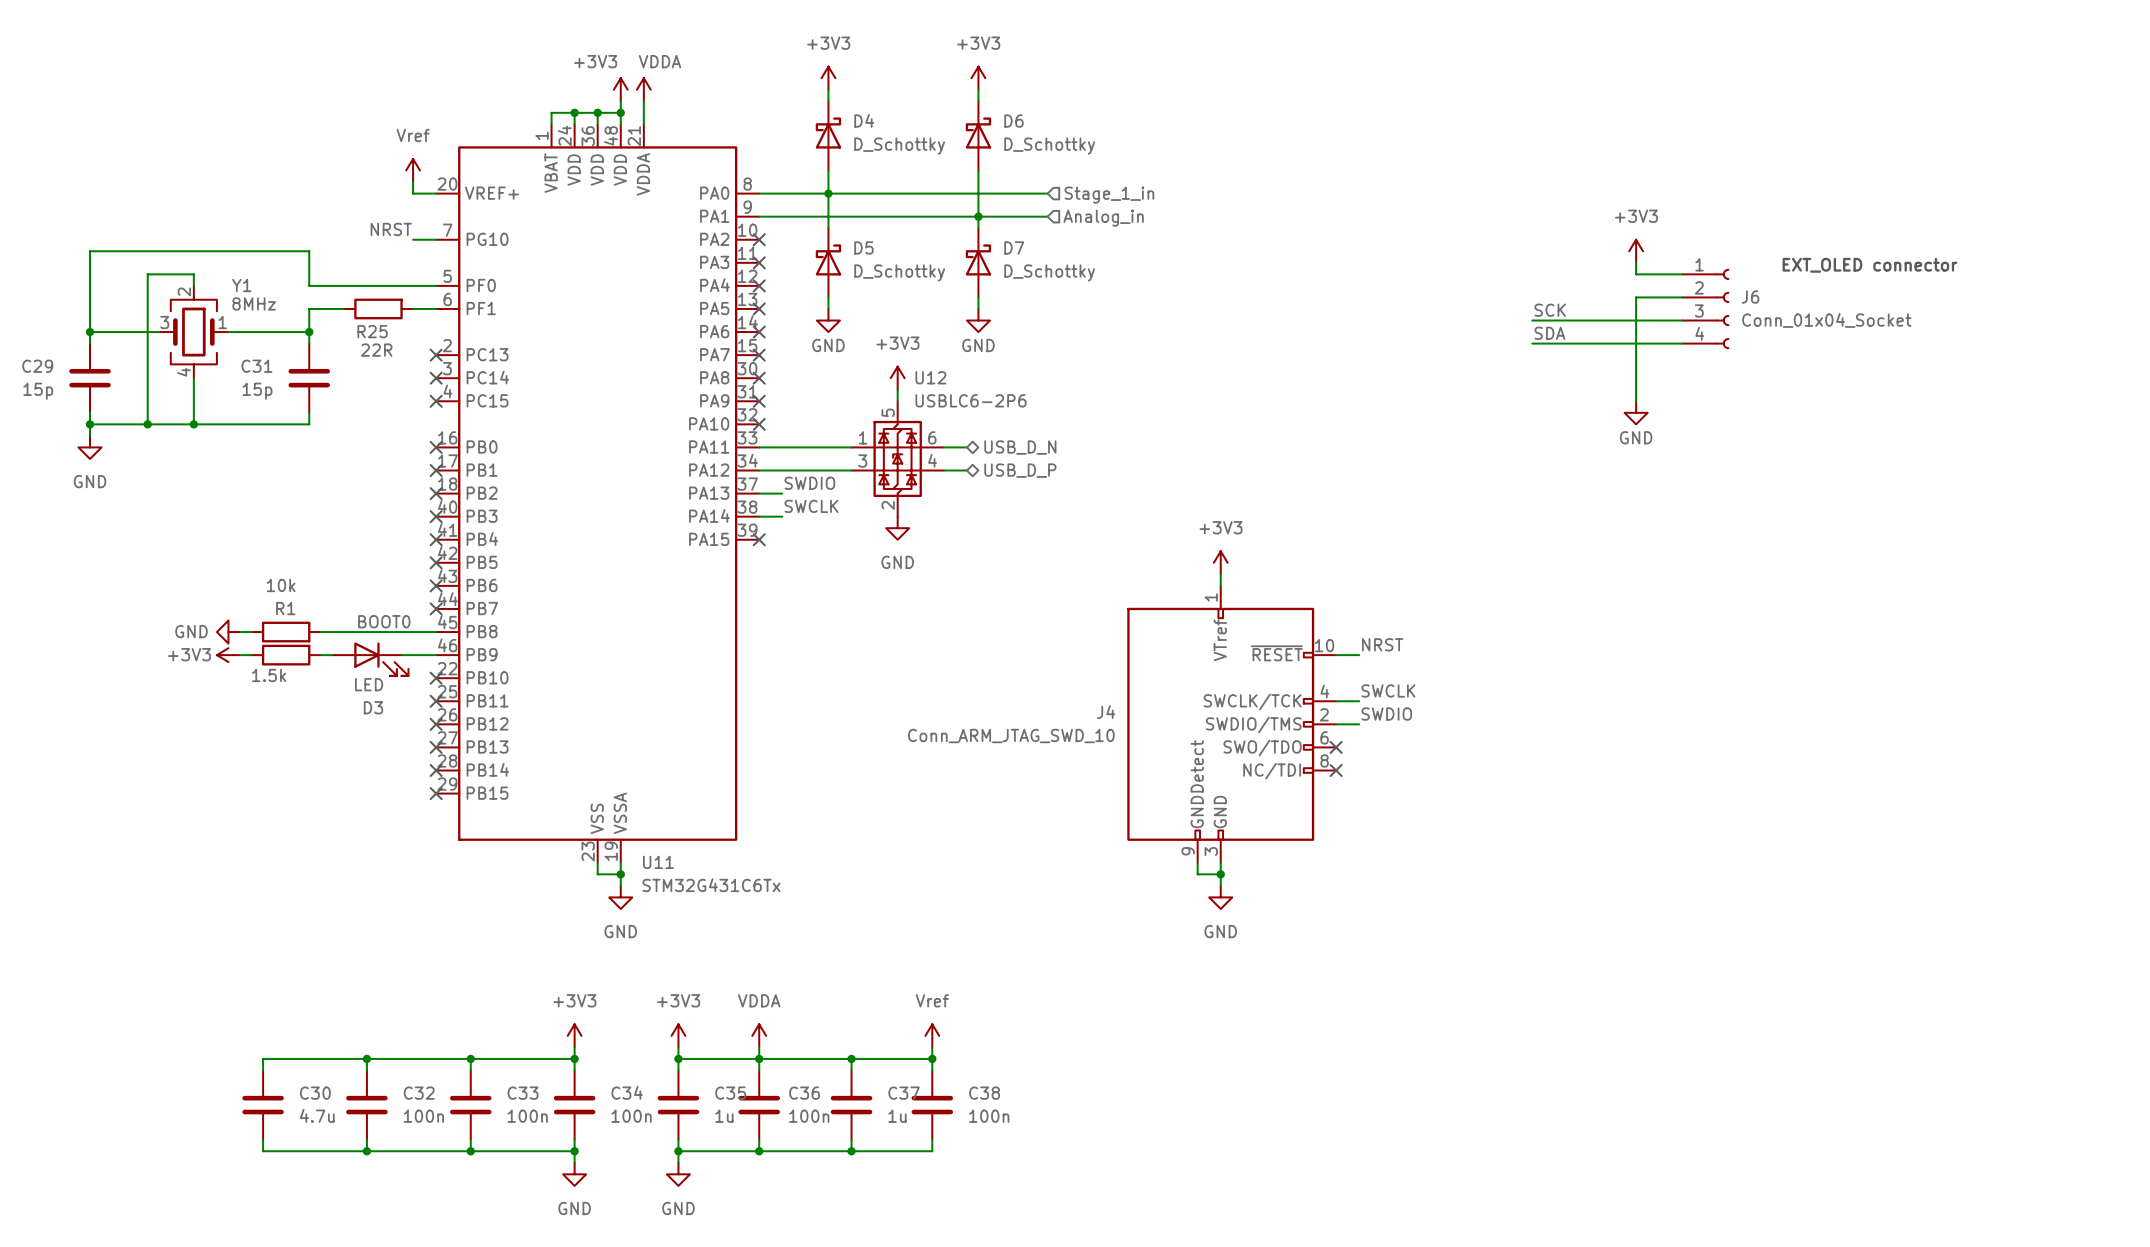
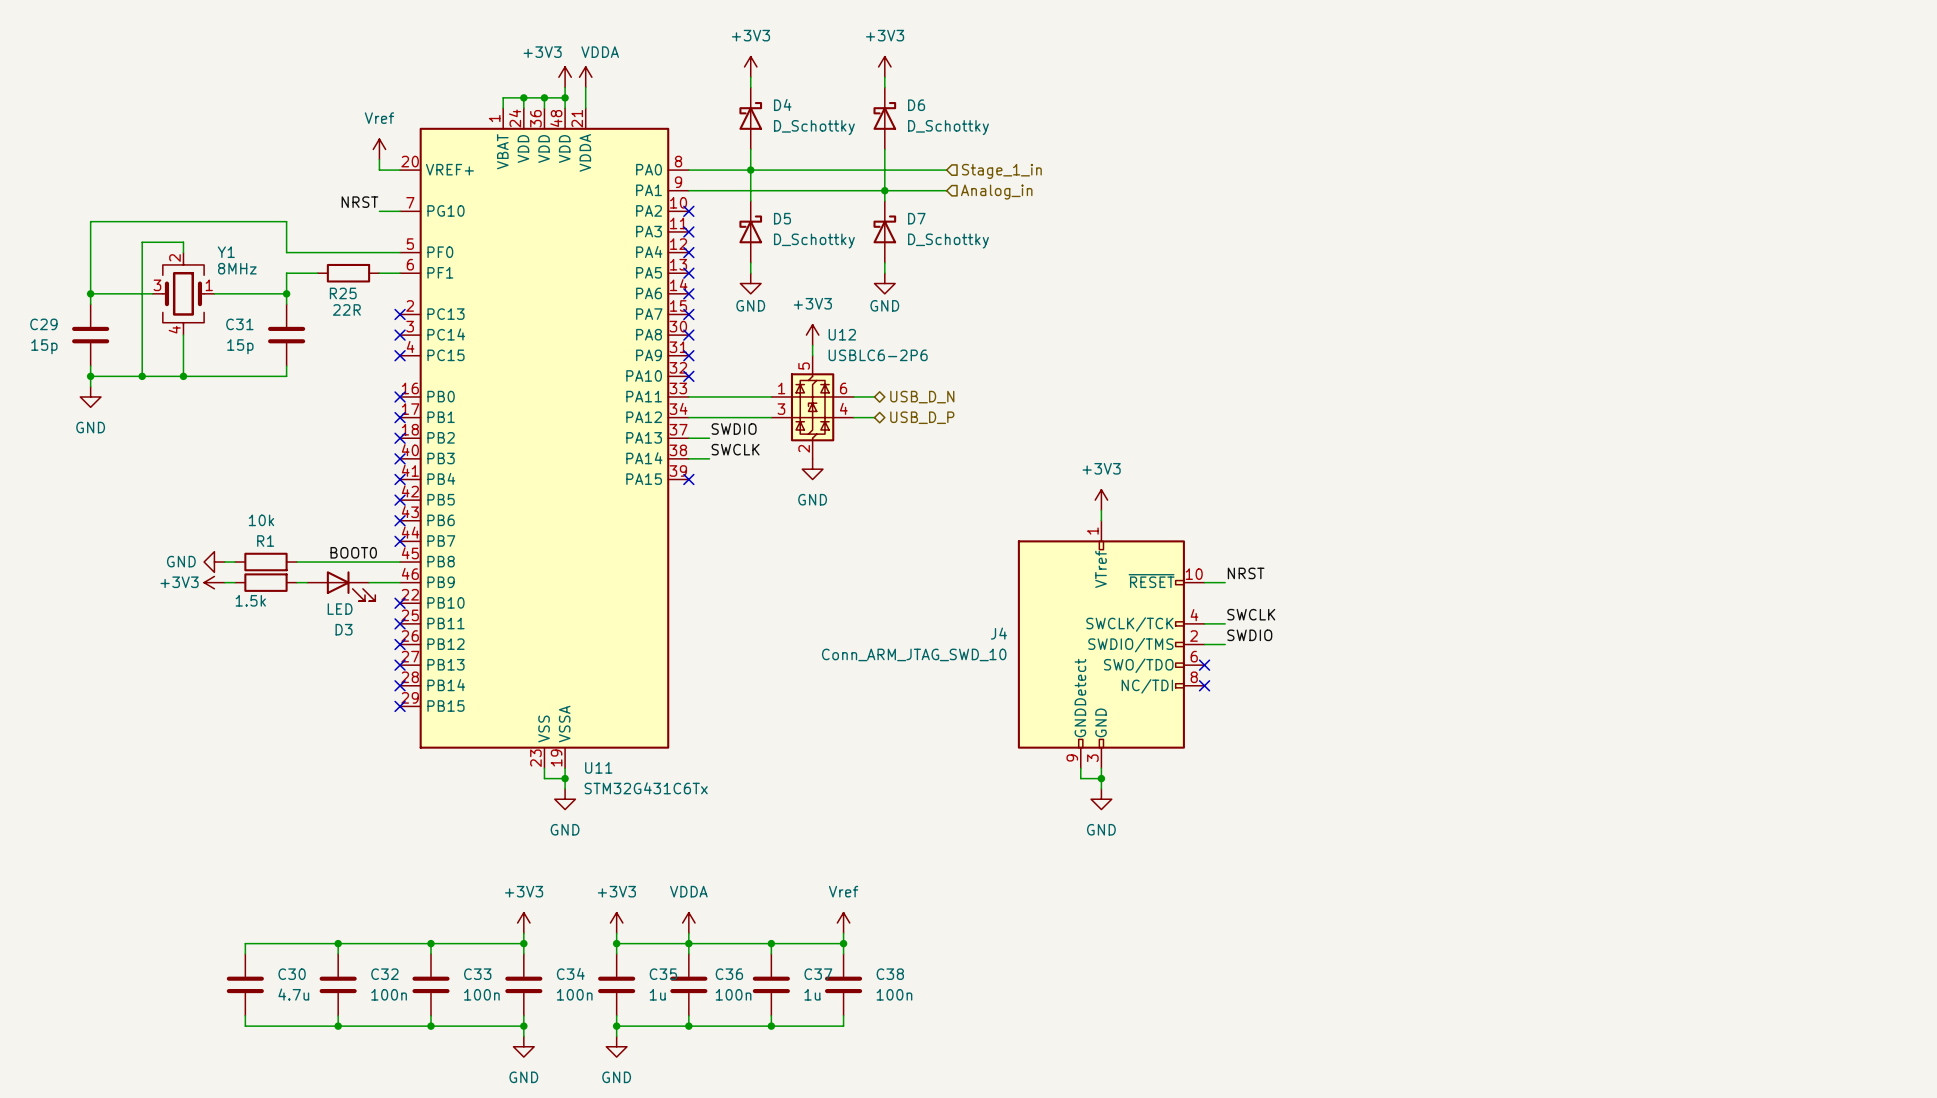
power symbol: +3V3 (1636, 251) -> none
wire: (1636, 262) (1636, 274) (1682, 274) -> none
text: EXT_OLED connector (1870, 265) -> none
wire: (1682, 297) (1636, 297) (1636, 401) -> none
J6: Conn_01x04_Socket (1705, 308) -> none
label: SCK (1550, 310) -> none
wire: (1532, 320) (1682, 320) -> none
label: SDA (1549, 333) -> none
wire: (1532, 343) (1682, 343) -> none
power symbol: GND (1636, 412) -> none

